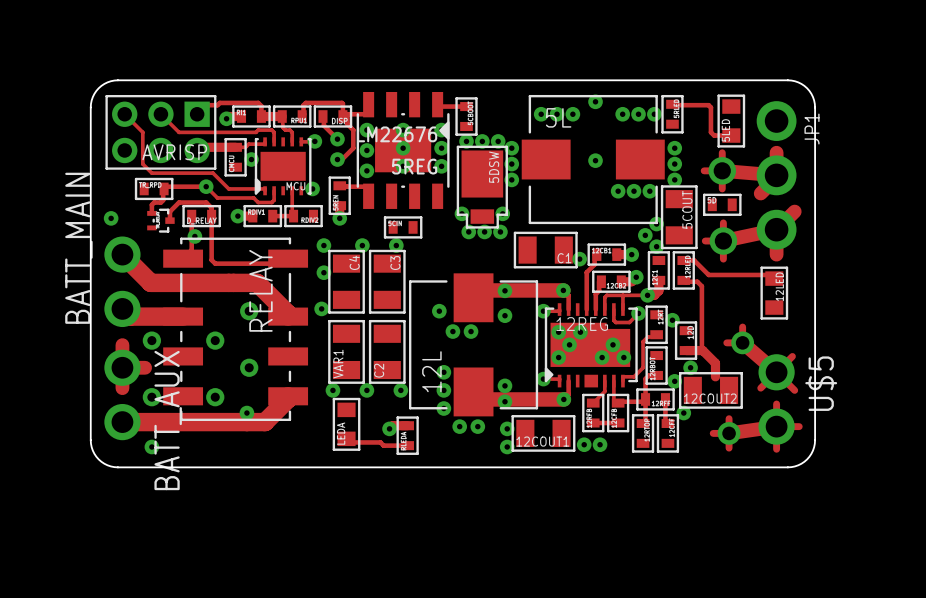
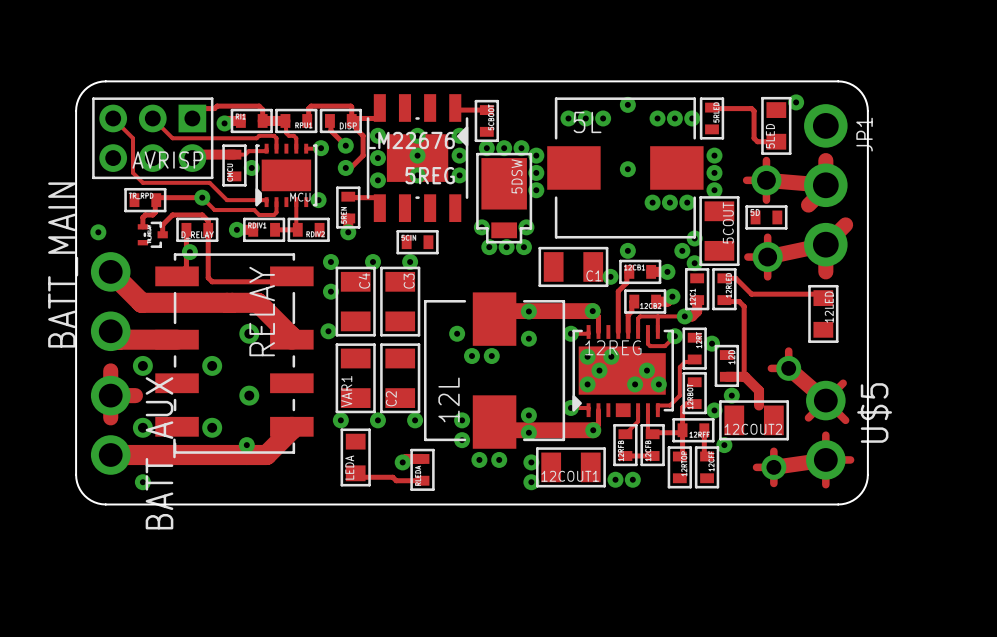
via: none -> (796, 102)
via: none -> (627, 250)
via: (443, 372) -> none

